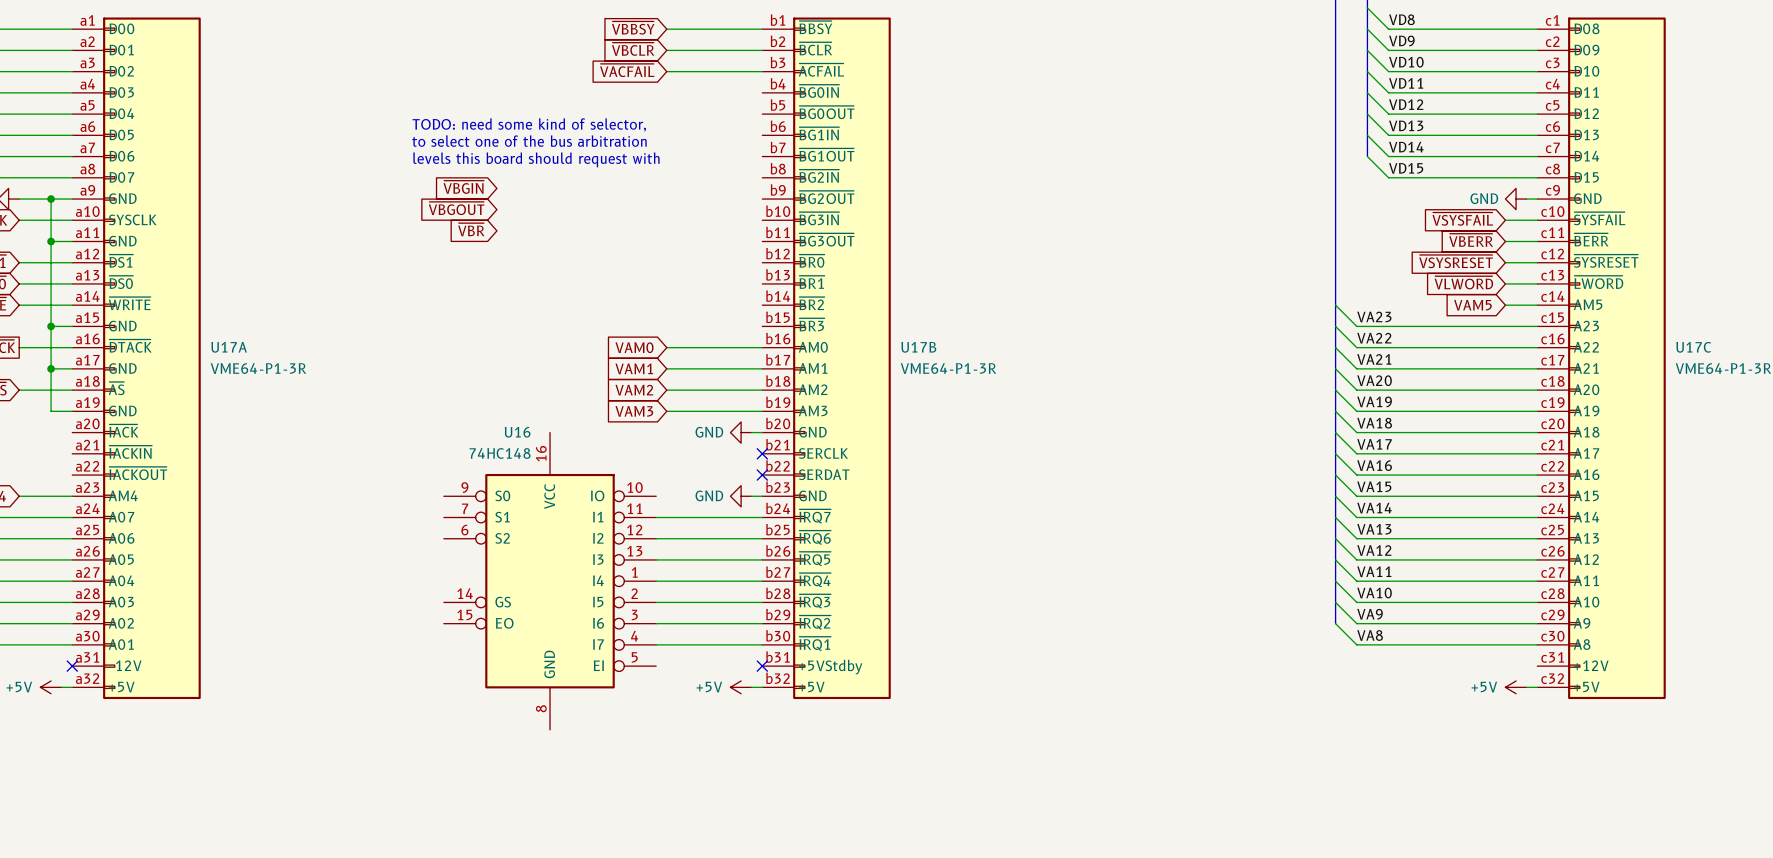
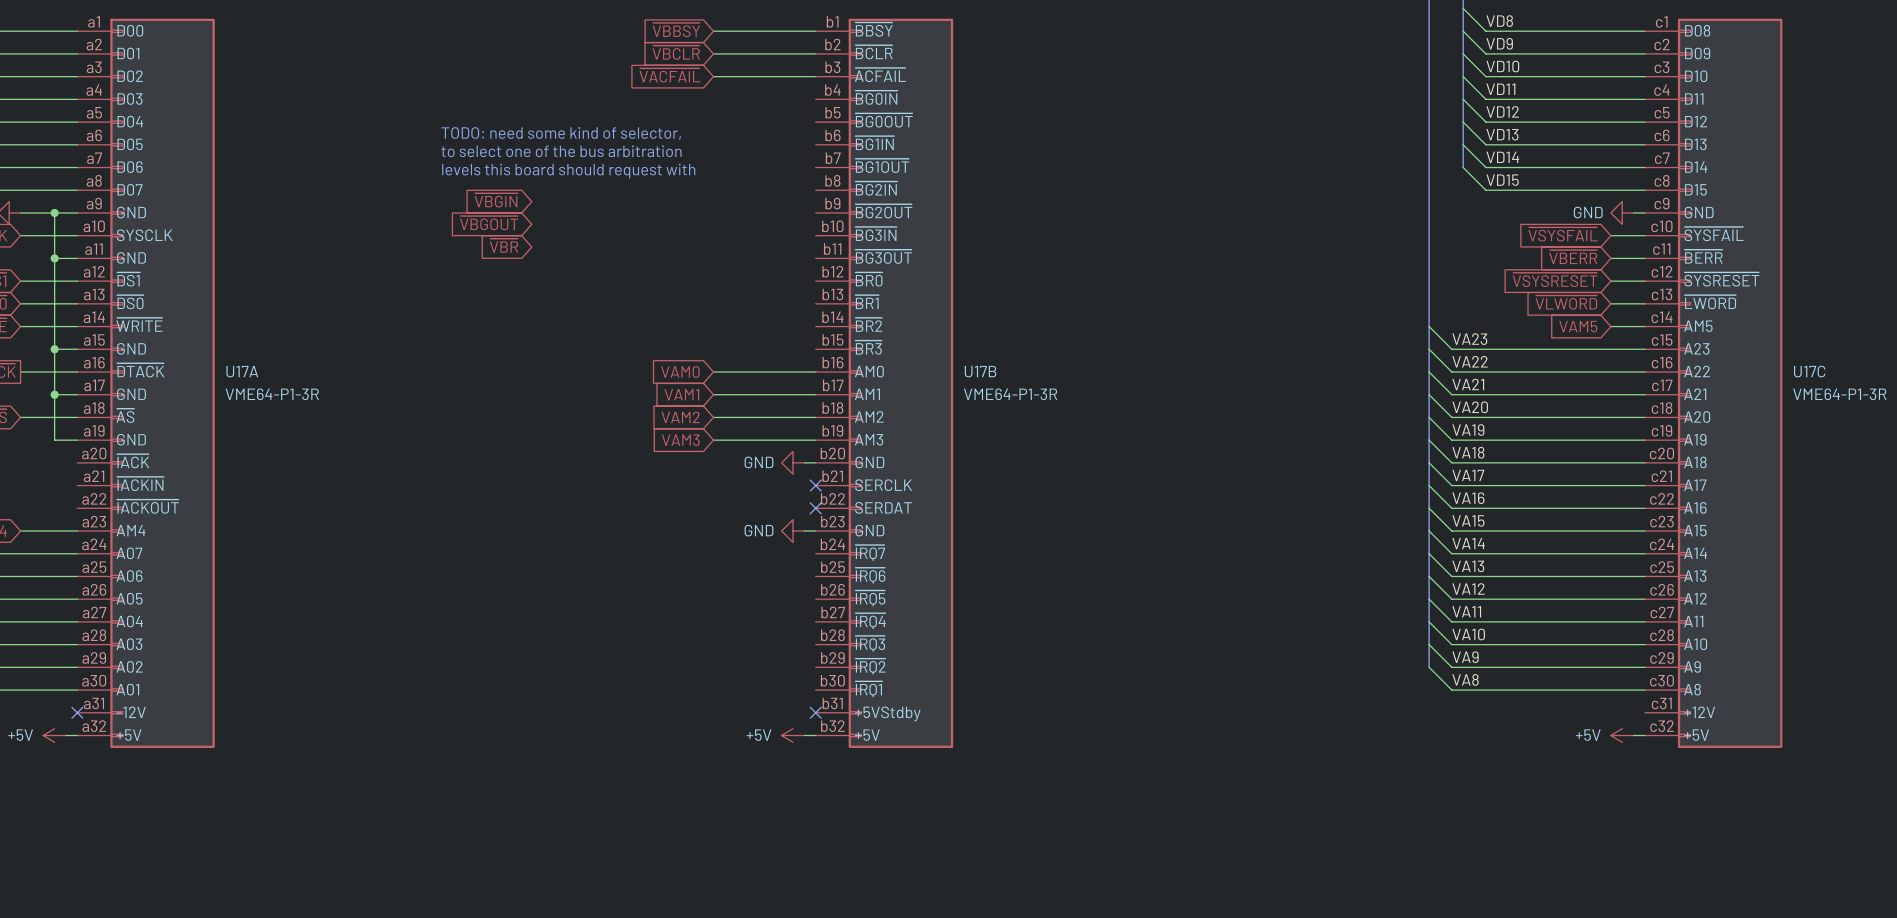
wire: (656, 517) (762, 517) -> none
wire: (656, 538) (762, 538) -> none
wire: (656, 559) (762, 559) -> none
U16: 74HC148 (550, 581) -> none
wire: (656, 581) (762, 581) -> none
wire: (656, 602) (762, 602) -> none
wire: (656, 623) (762, 623) -> none
wire: (656, 644) (762, 644) -> none

